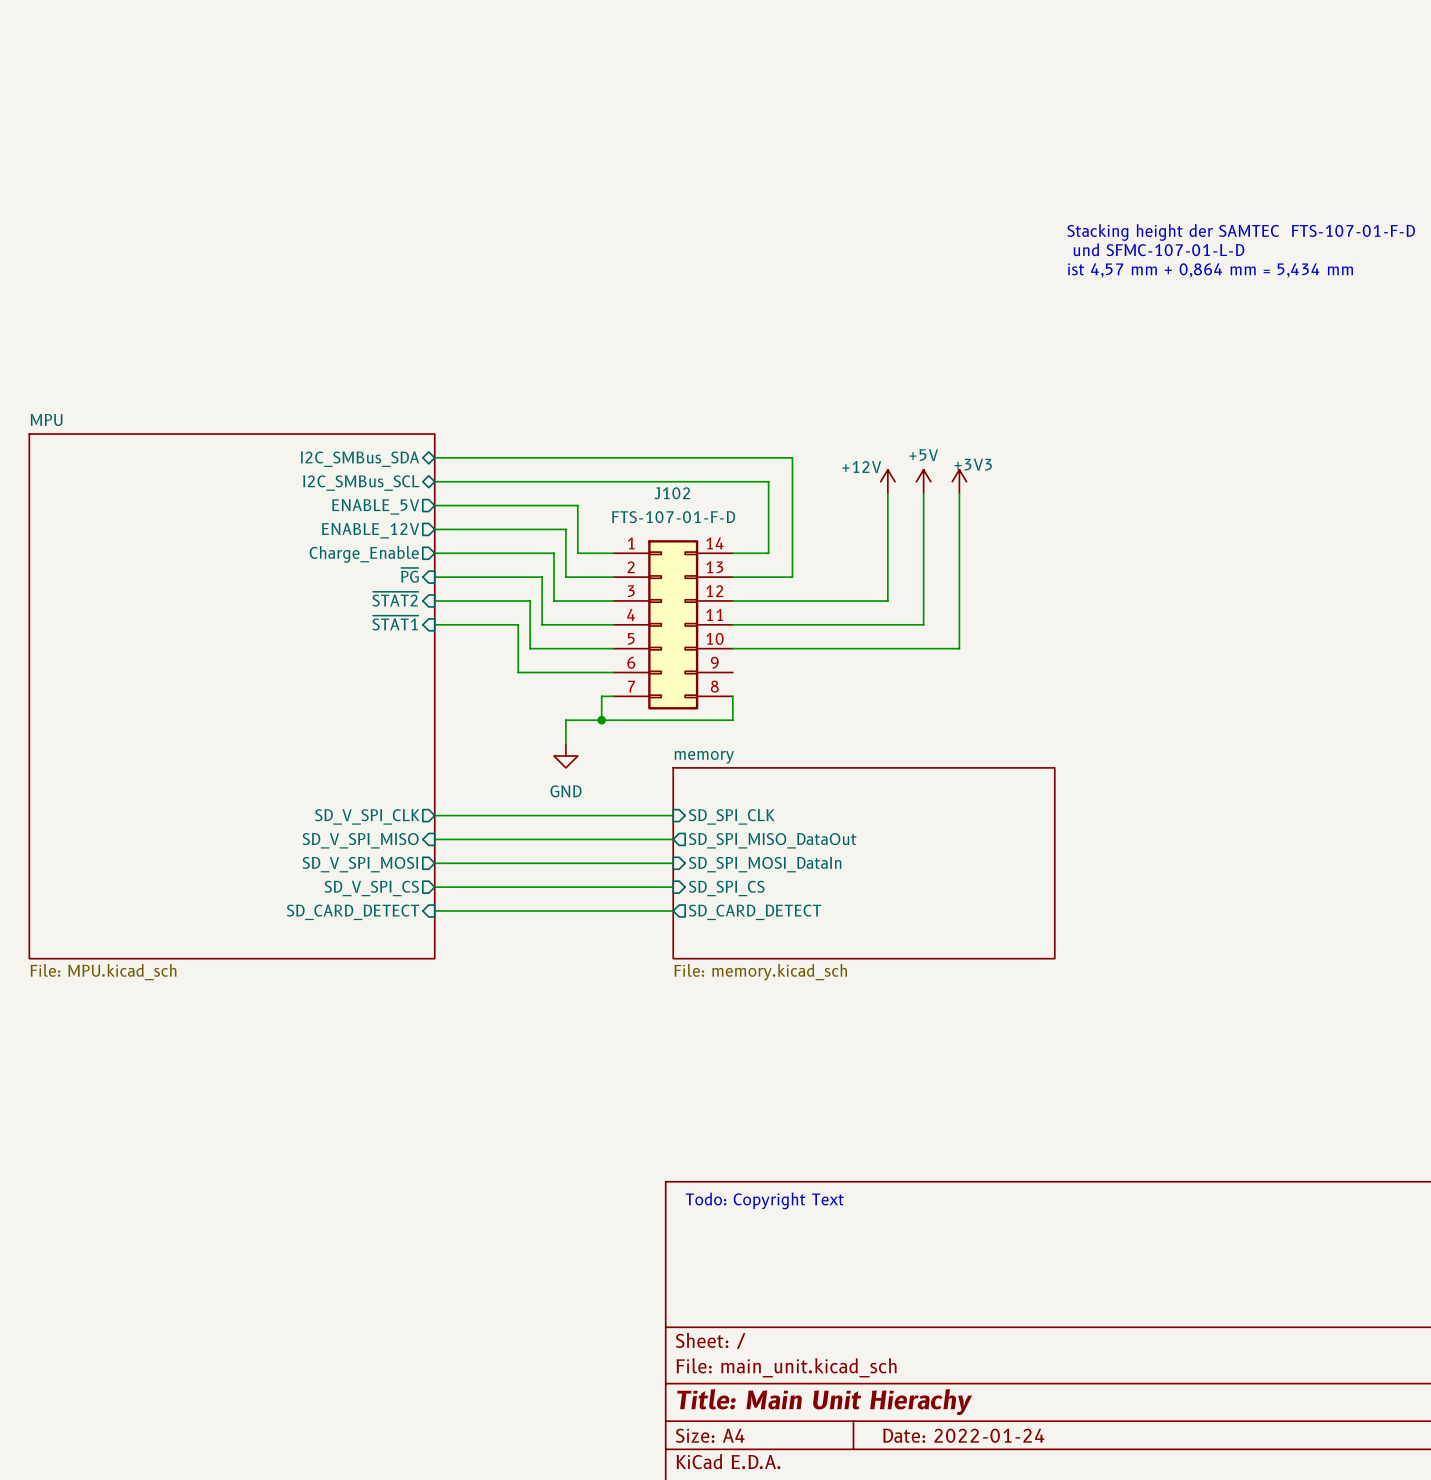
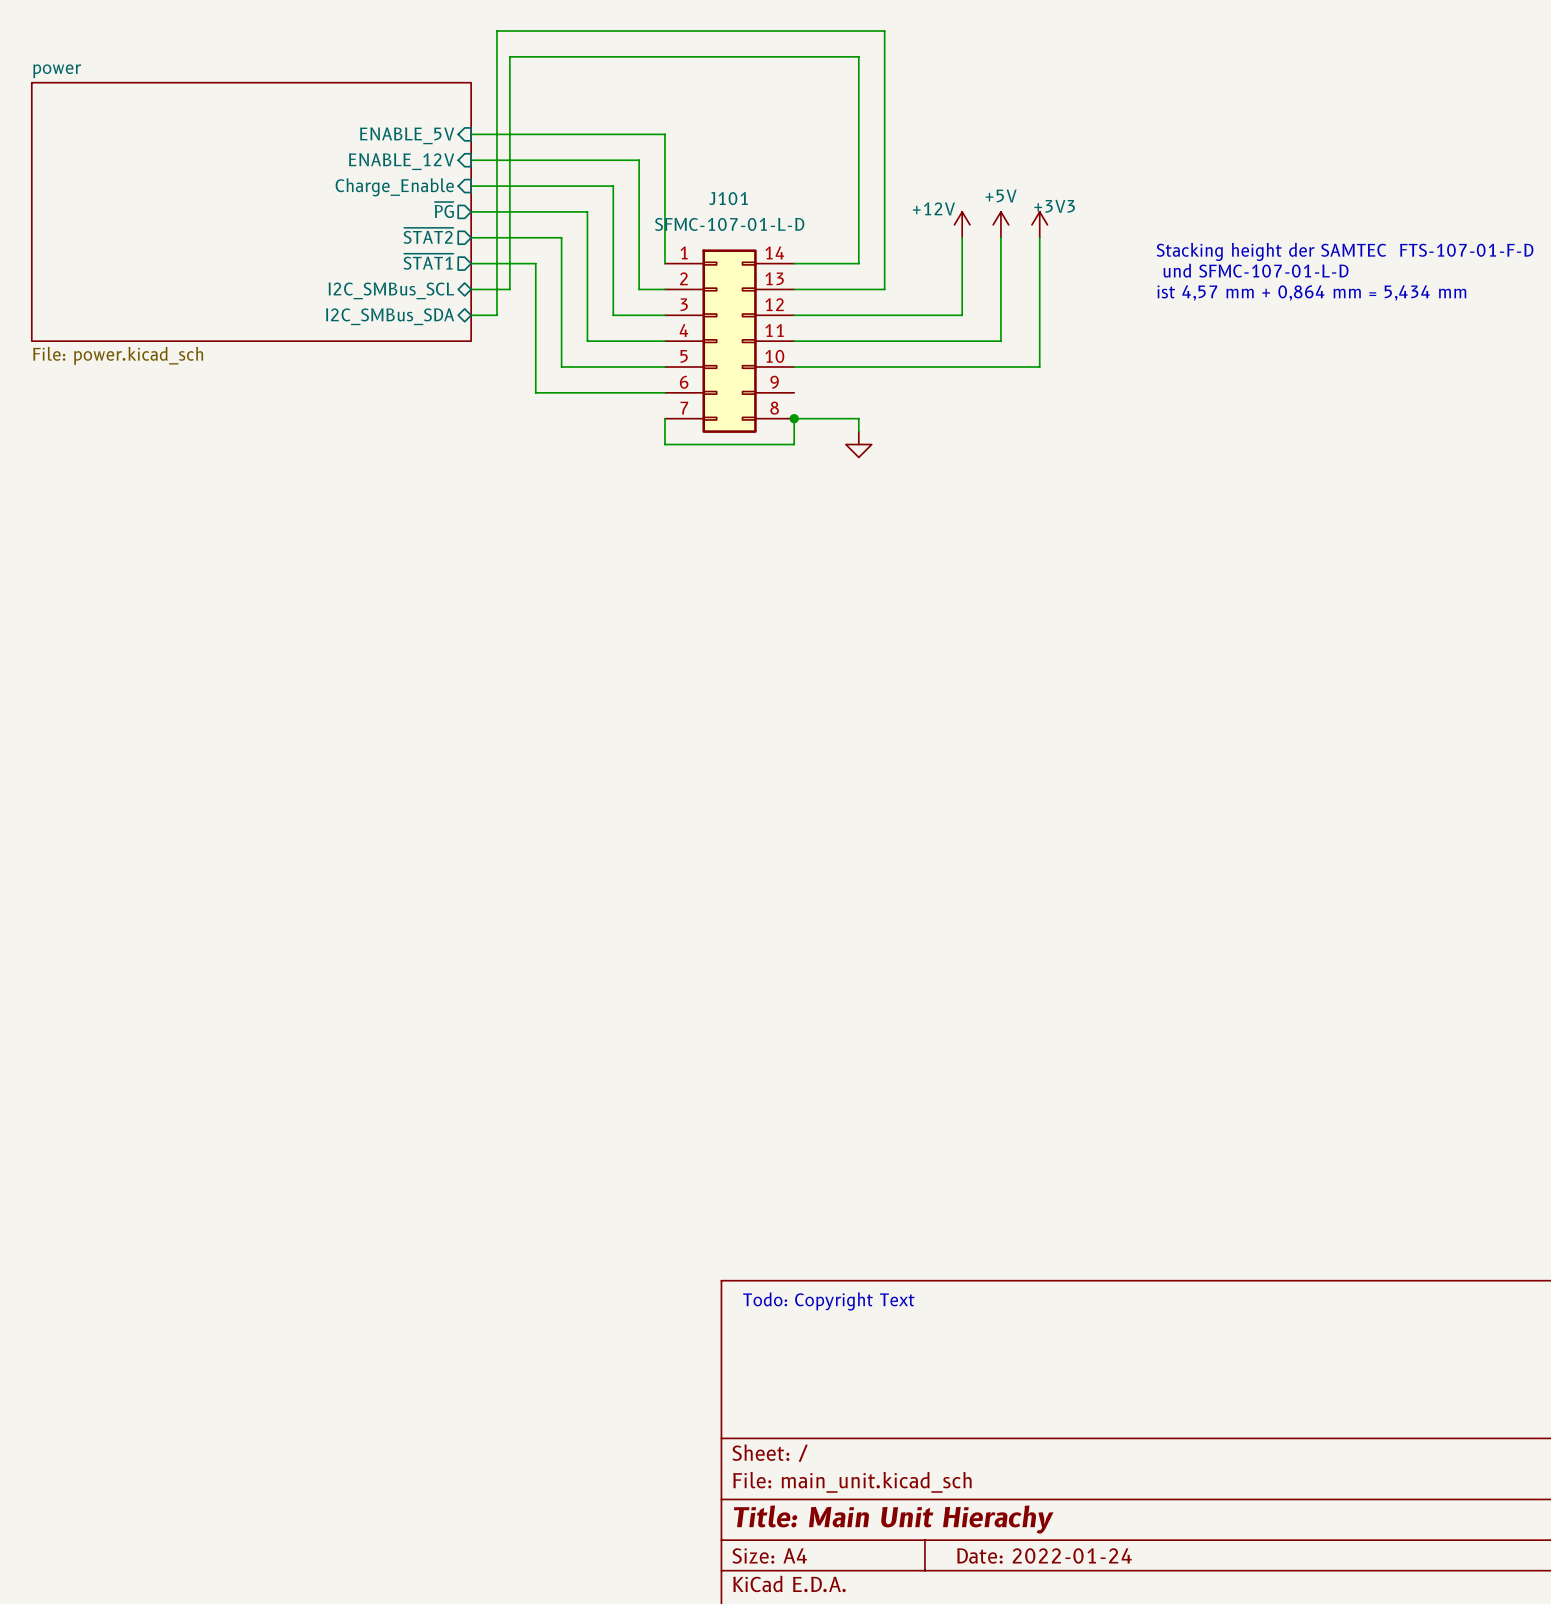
wire: none -> (471, 134) (664, 134) (664, 263)
sheet pin: none -> ENABLE_5V (407, 135)
wire: none -> (471, 160) (639, 160) (639, 289) (664, 289)
sheet pin: none -> ENABLE_12V (401, 161)
wire: none -> (471, 186) (613, 186) (613, 315) (664, 315)
sheet pin: none -> Charge_Enable (394, 187)
sheet pin: none -> ~{PG} (444, 210)
sheet power: none -> File: power.kicad_sch (251, 211)
wire: none -> (471, 211) (587, 211) (587, 341) (664, 341)
power symbol: none -> +12V (962, 224)
power symbol: none -> +5V (1000, 224)
power symbol: none -> +3V3 (1039, 224)
sheet pin: none -> ~{STAT2} (428, 235)
wire: none -> (471, 237) (561, 237) (561, 366) (664, 366)
wire: none -> (962, 237) (962, 315) (794, 315)
wire: none -> (1000, 237) (1000, 341) (794, 341)
wire: none -> (1039, 237) (1039, 366) (794, 366)
sheet pin: none -> ~{STAT1} (428, 261)
wire: none -> (471, 263) (535, 263) (535, 392) (664, 392)
wire: none -> (794, 263) (858, 263) (858, 56) (509, 56) (509, 289) (471, 289)
wire: none -> (794, 289) (884, 289) (884, 31) (496, 31) (496, 315) (471, 315)
J101: none -> SFMC-107-01-L-D (729, 341)
wire: none -> (664, 418) (664, 444) (794, 444) (794, 418) (858, 418) (858, 431)
junction: none -> (794, 418)
power symbol: none -> (858, 444)
wire: (434, 457) (792, 457) (792, 577) (732, 577) -> none
sheet pin position: I2C_SMBus_SDA (359, 459) -> I2C_SMBus_SDA (390, 316)
wire: (434, 481) (768, 481) (768, 553) (732, 553) -> none
power symbol: +12V (887, 481) -> none
power symbol: +5V (923, 481) -> none
power symbol: +3V3 (959, 481) -> none
sheet pin position: I2C_SMBus_SCL (361, 483) -> I2C_SMBus_SCL (391, 290)
wire: (887, 493) (887, 600) (732, 600) -> none
wire: (923, 493) (923, 624) (732, 624) -> none
wire: (959, 493) (959, 648) (732, 648) -> none
wire: (434, 505) (577, 505) (577, 553) (613, 553) -> none
sheet pin: ENABLE_5V (375, 506) -> none
wire: (434, 529) (565, 529) (565, 577) (613, 577) -> none
sheet pin: ENABLE_12V (370, 530) -> none
wire: (434, 553) (553, 553) (553, 600) (613, 600) -> none
sheet pin: Charge_Enable (364, 554) -> none
sheet pin: ~{PG} (410, 575) -> none
wire: (434, 577) (542, 577) (542, 624) (613, 624) -> none
sheet pin: ~{STAT2} (395, 599) -> none
wire: (434, 600) (530, 600) (530, 648) (613, 648) -> none
sheet pin: ~{STAT1} (395, 623) -> none
wire: (434, 624) (518, 624) (518, 672) (613, 672) -> none
J102: FTS-107-01-F-D (673, 624) -> none
sheet MPU: File: MPU.kicad_sch (232, 696) -> none
wire: (613, 696) (601, 696) (601, 720) -> none
wire: (732, 696) (732, 720) (565, 720) (565, 744) -> none
junction: (601, 720) -> none
power symbol: GND (565, 755) -> none
wire: (434, 815) (673, 815) -> none
sheet pin: SD_V_SPI_CLK (367, 816) -> none
sheet pin: SD_SPI_CLK (731, 816) -> none
wire: (434, 839) (673, 839) -> none
sheet pin: SD_V_SPI_MISO (360, 840) -> none
sheet pin: SD_SPI_MISO_DataOut (772, 840) -> none
wire: (434, 863) (673, 863) -> none
sheet memory: File: memory.kicad_sch (864, 863) -> none
sheet pin: SD_V_SPI_MOSI (360, 864) -> none
sheet pin: SD_SPI_MOSI_DataIn (765, 864) -> none
wire: (434, 887) (673, 887) -> none
sheet pin: SD_V_SPI_CS (371, 888) -> none
sheet pin: SD_SPI_CS (726, 888) -> none
wire: (434, 910) (673, 910) -> none
sheet pin: SD_CARD_DETECT (352, 912) -> none
sheet pin: SD_CARD_DETECT (755, 912) -> none

